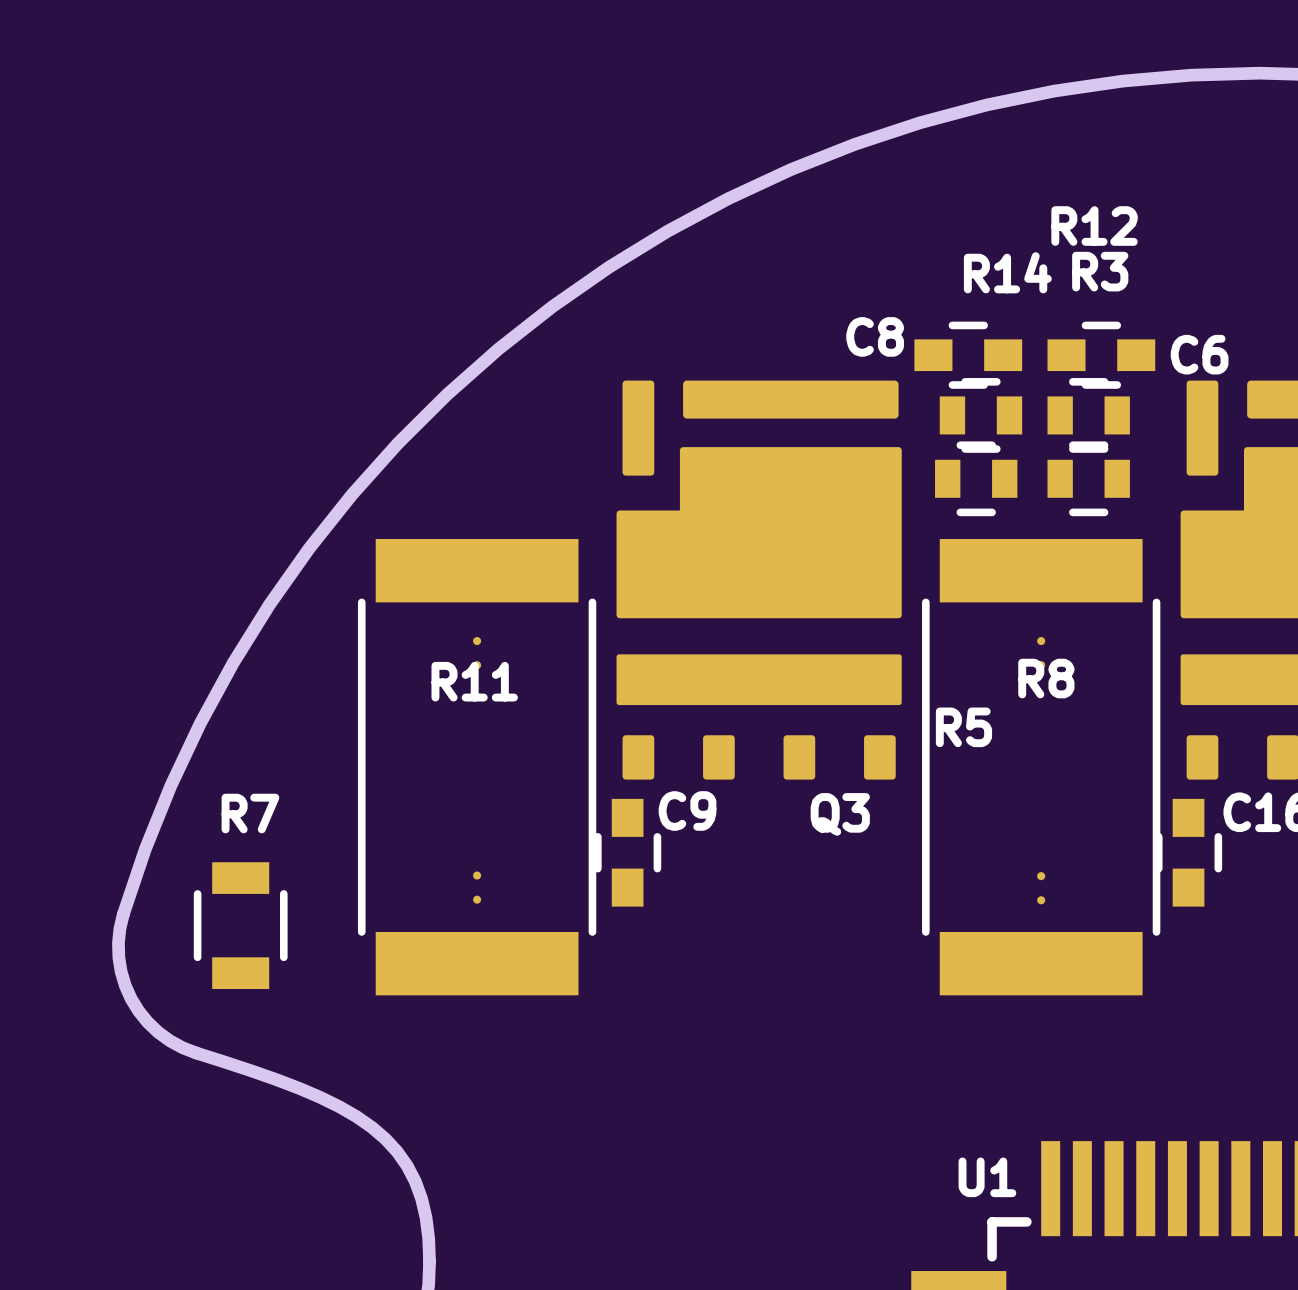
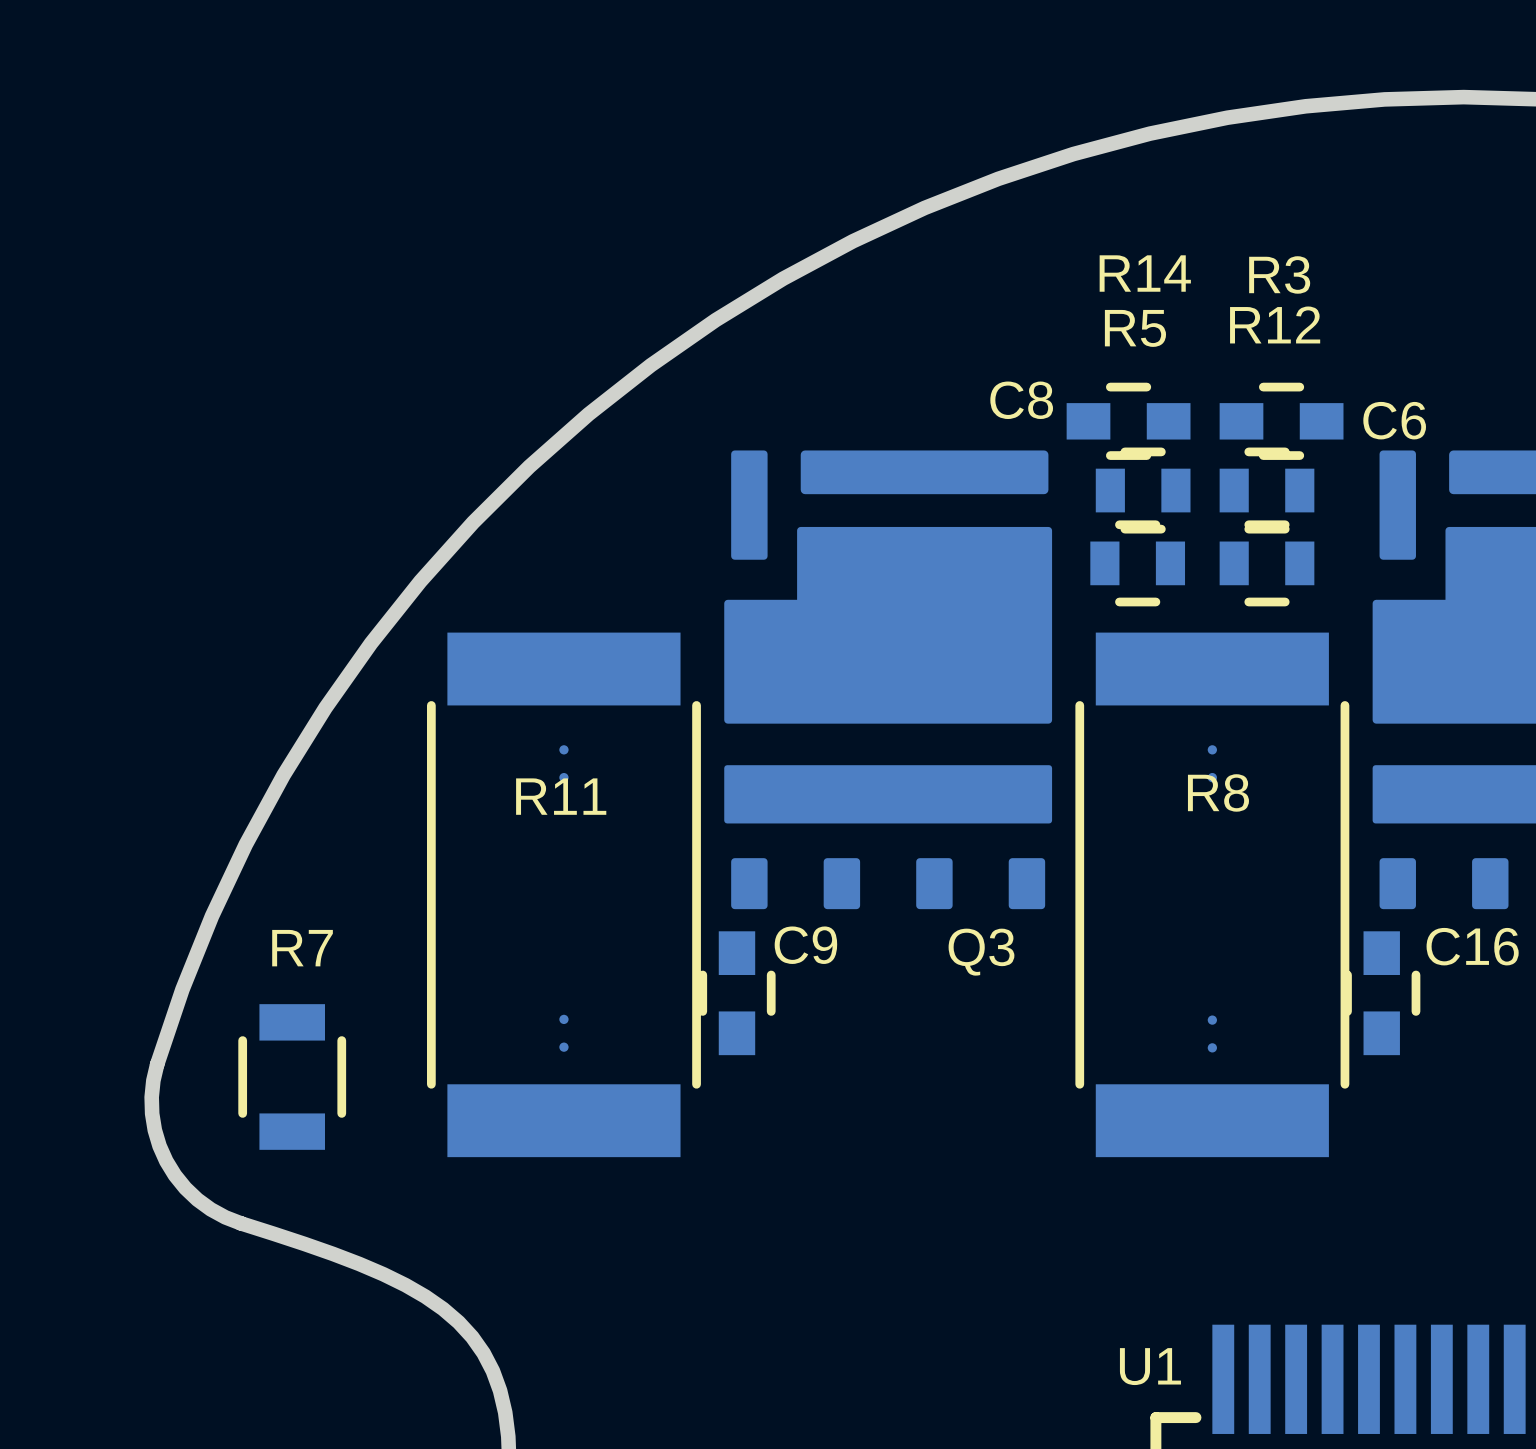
R12 name position: R12 (1094, 226) -> R12 (1275, 324)
R3 name position: R3 (1100, 271) -> R3 (1279, 274)
R14 name position: R14 (1007, 272) -> R14 (1145, 273)
R5 name position: R5 (963, 727) -> R5 (1135, 328)

